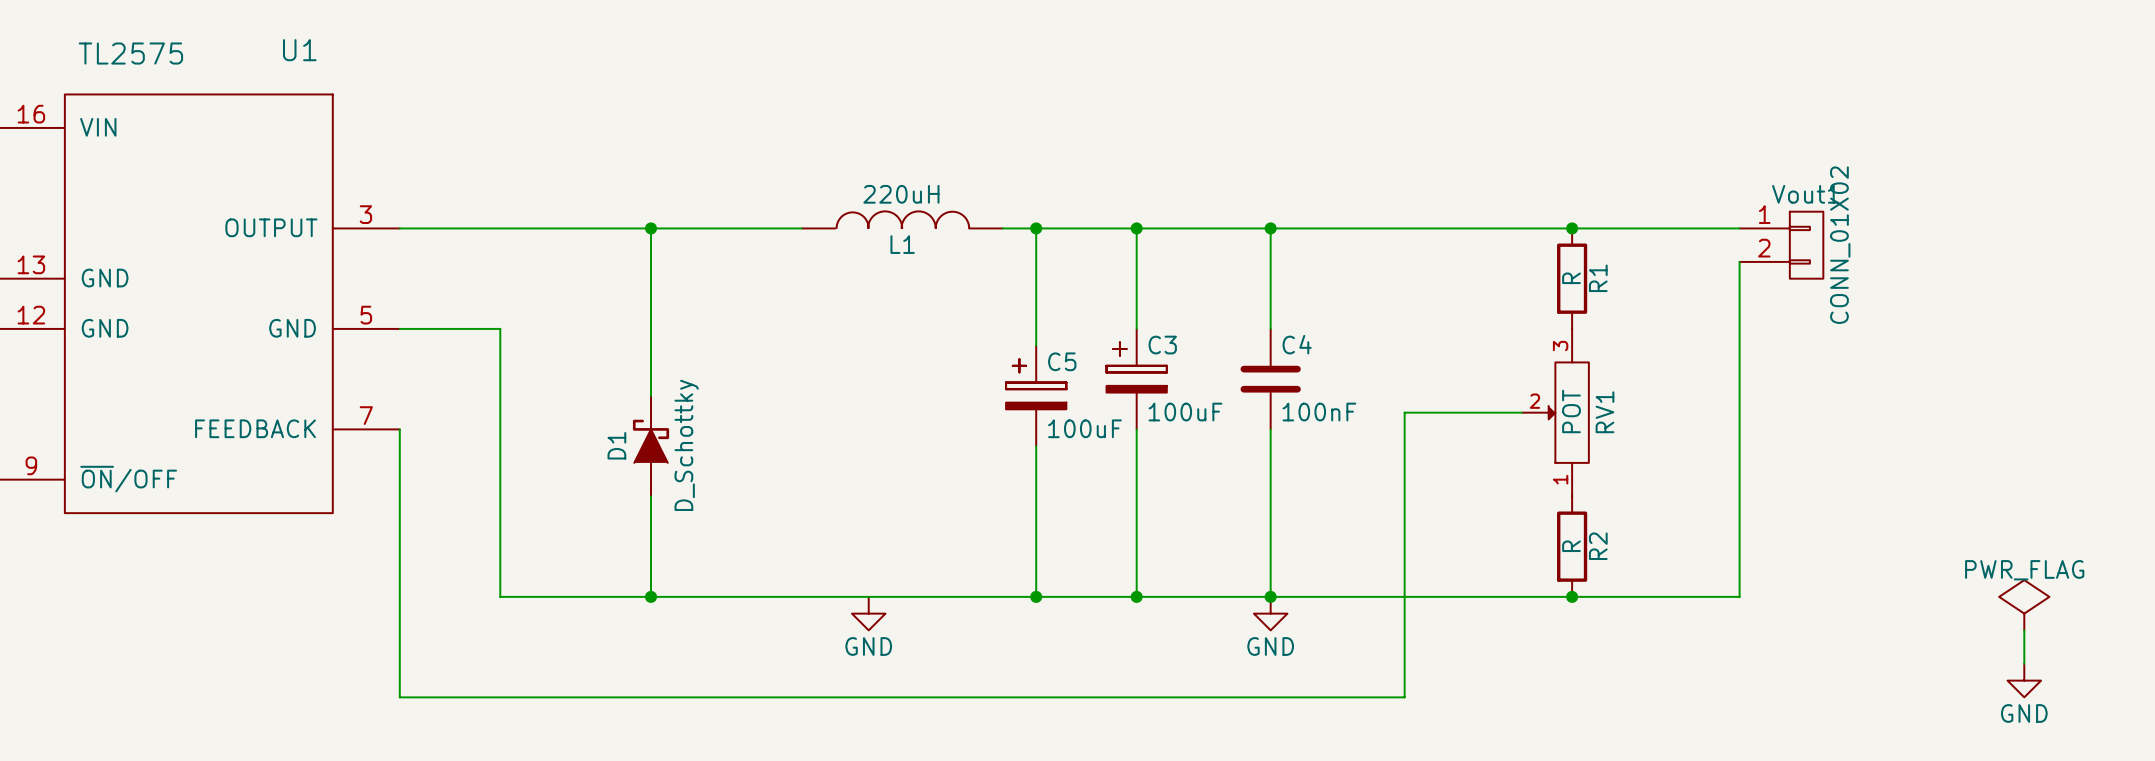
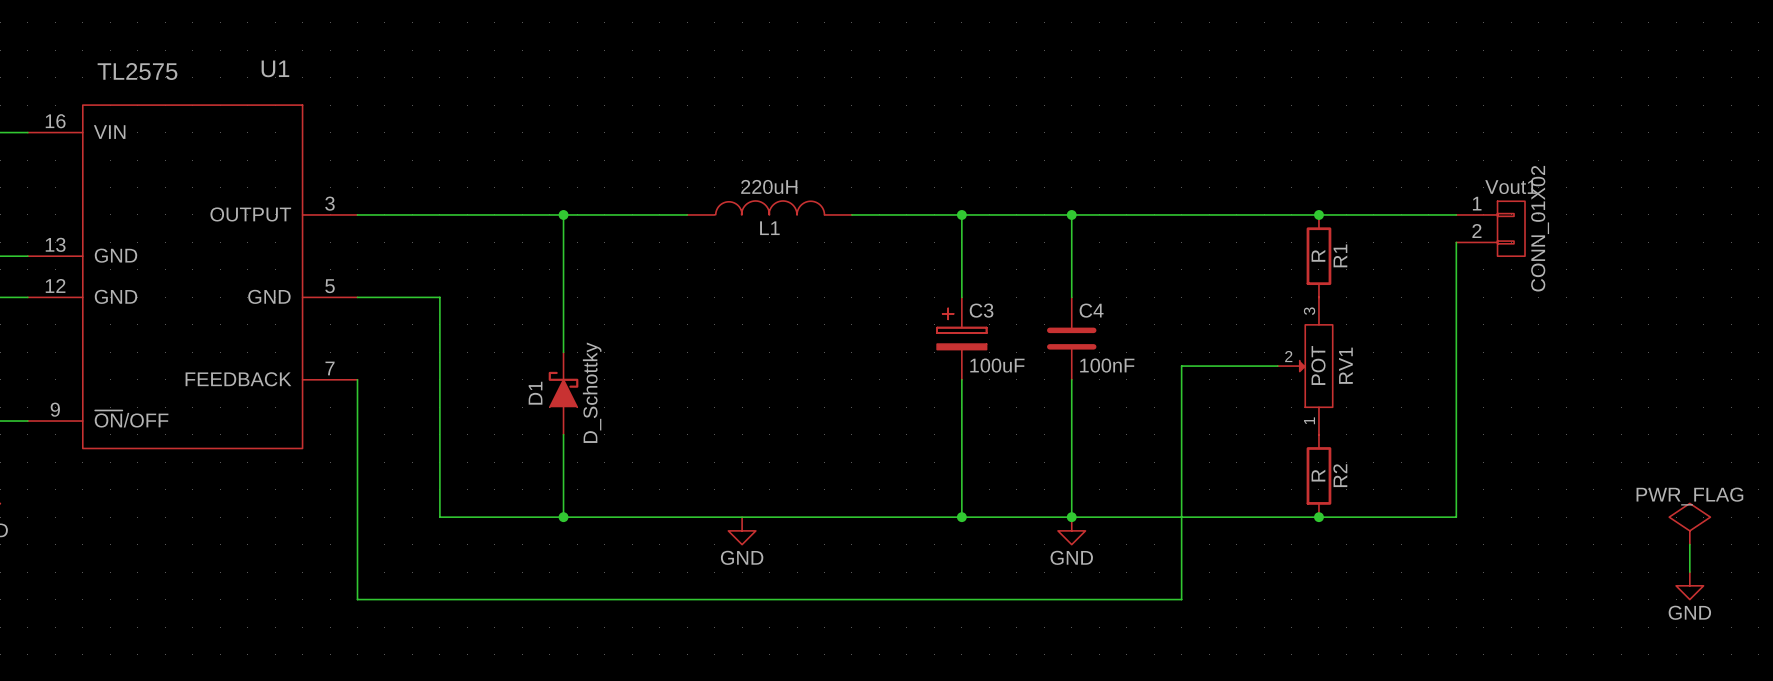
wire: (1036, 228) (1036, 345) -> none
junction: (1036, 228) -> none
C5: 100uF (1036, 395) -> none
wire: (1036, 446) (1036, 596) -> none
junction: (1036, 596) -> none

